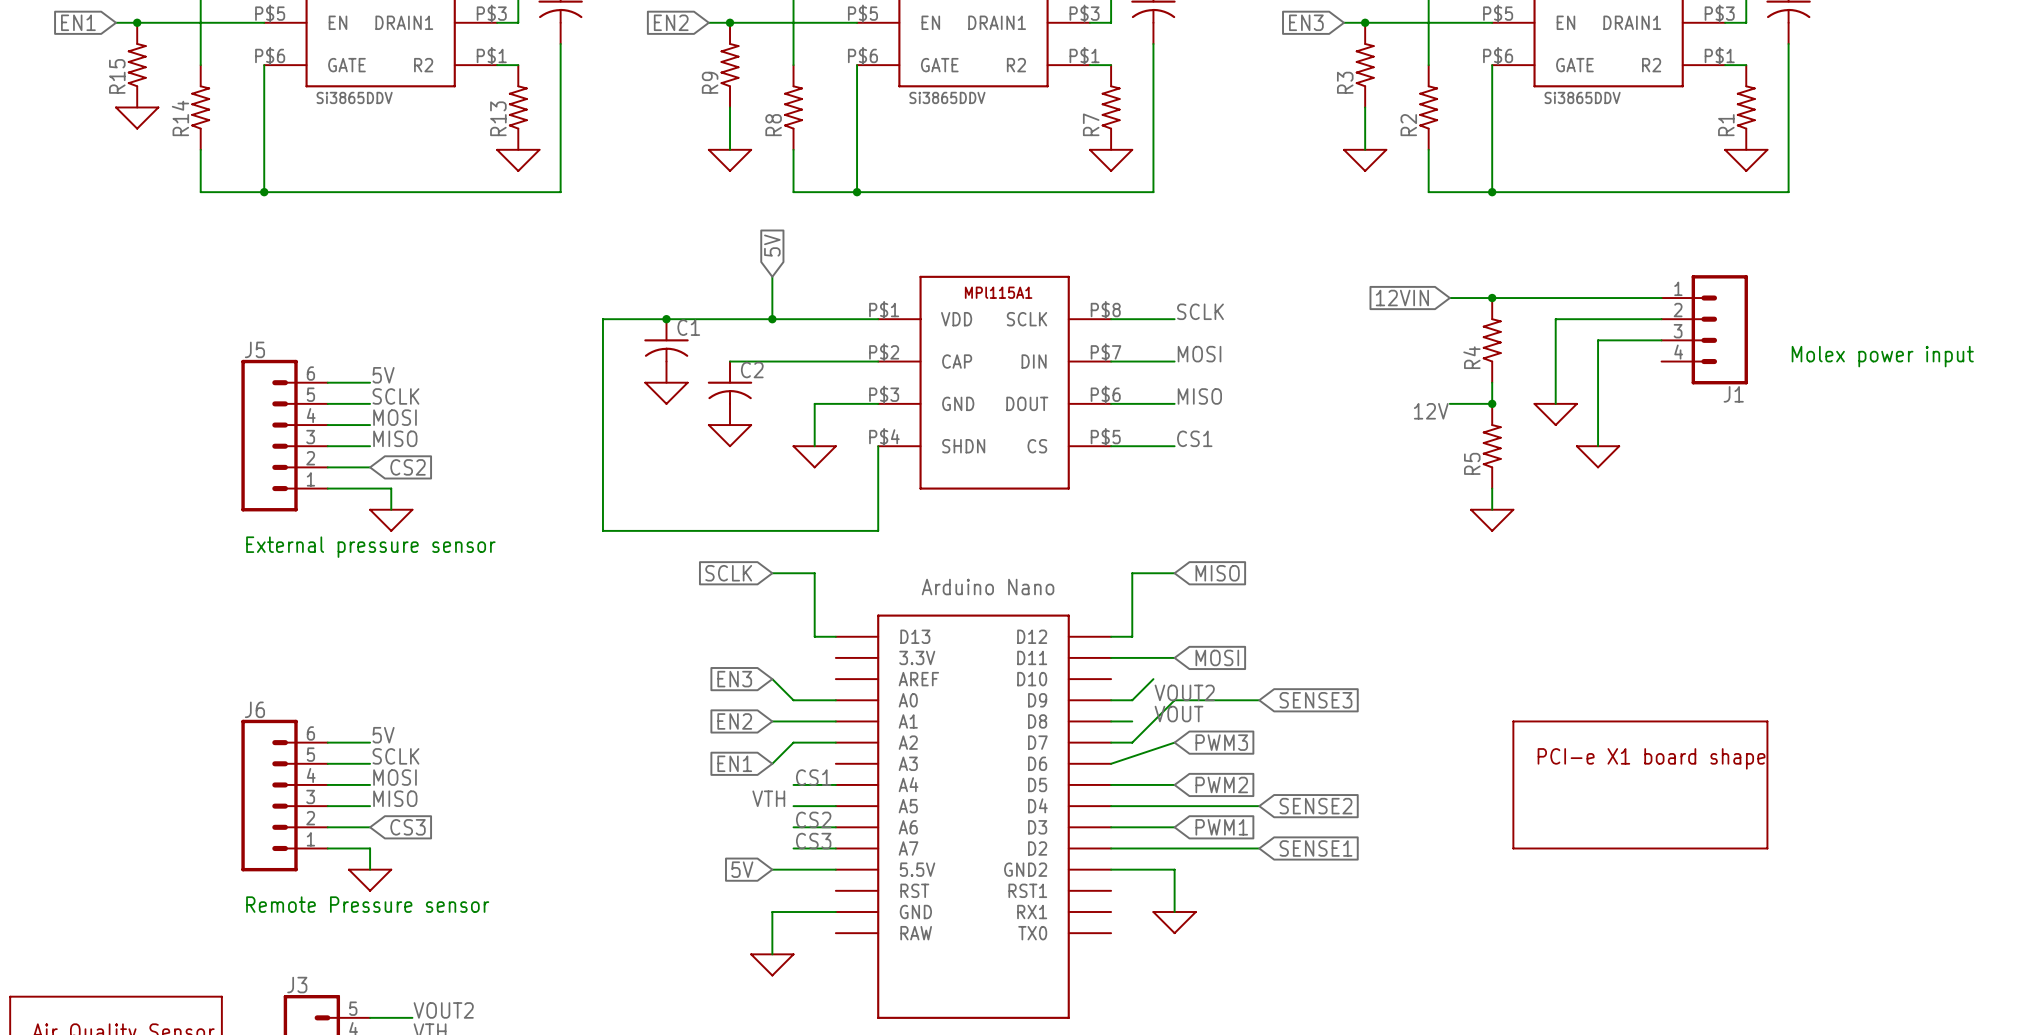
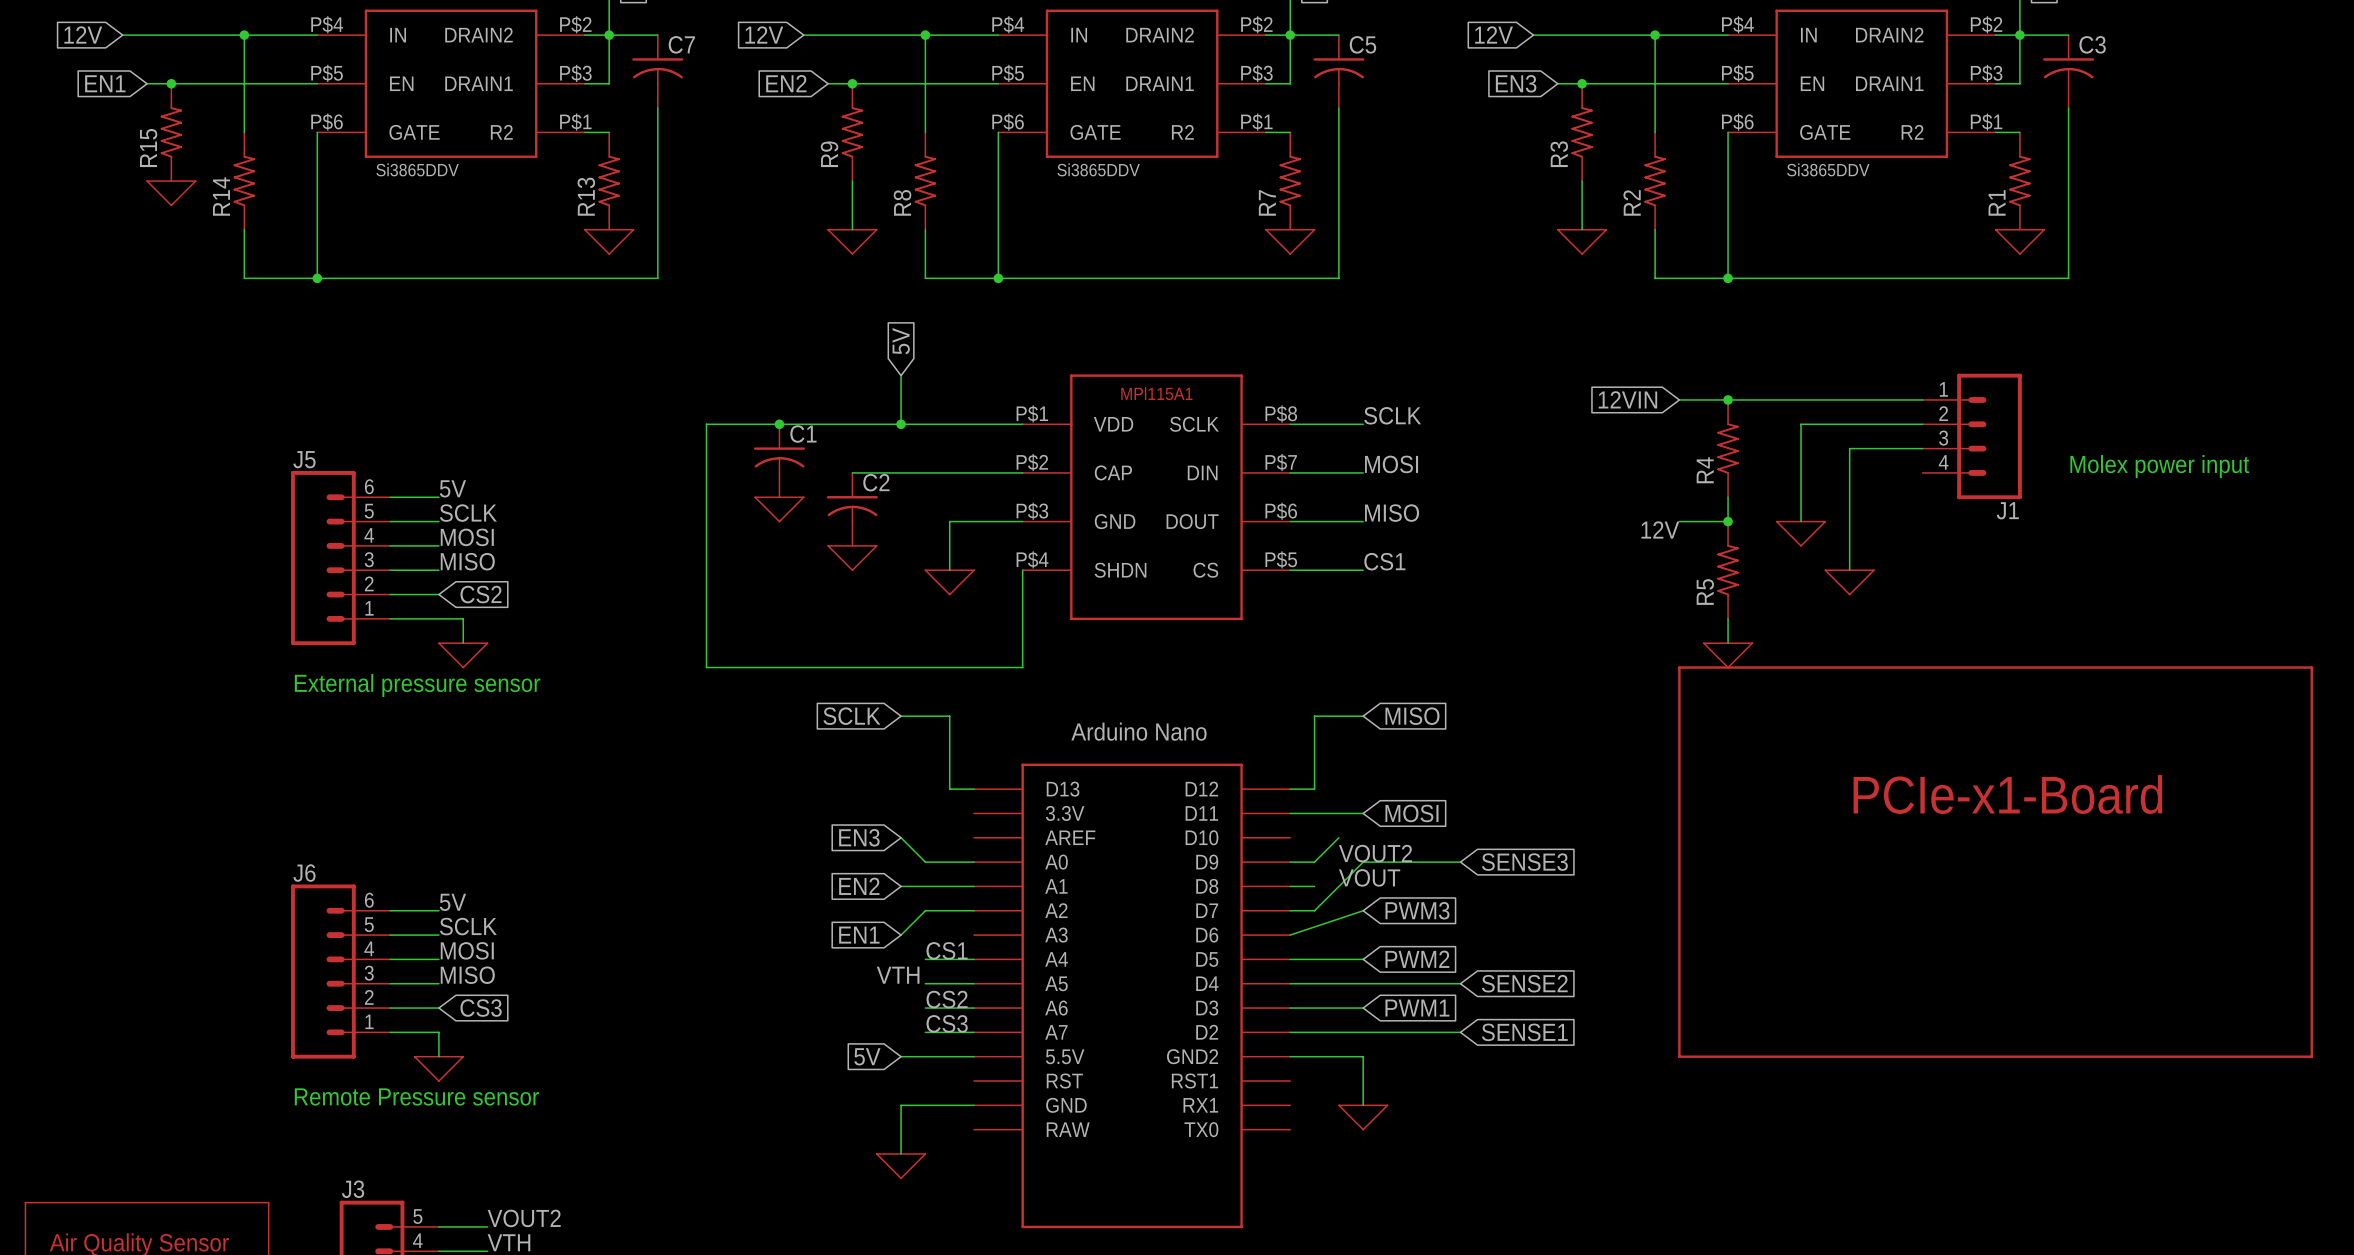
part: none -> (1995, 862)
line: (1513, 721) (1767, 721) (1767, 848) (1513, 848) (1513, 721) -> none
text: PCI-e X1 board shape (1651, 758) -> none

